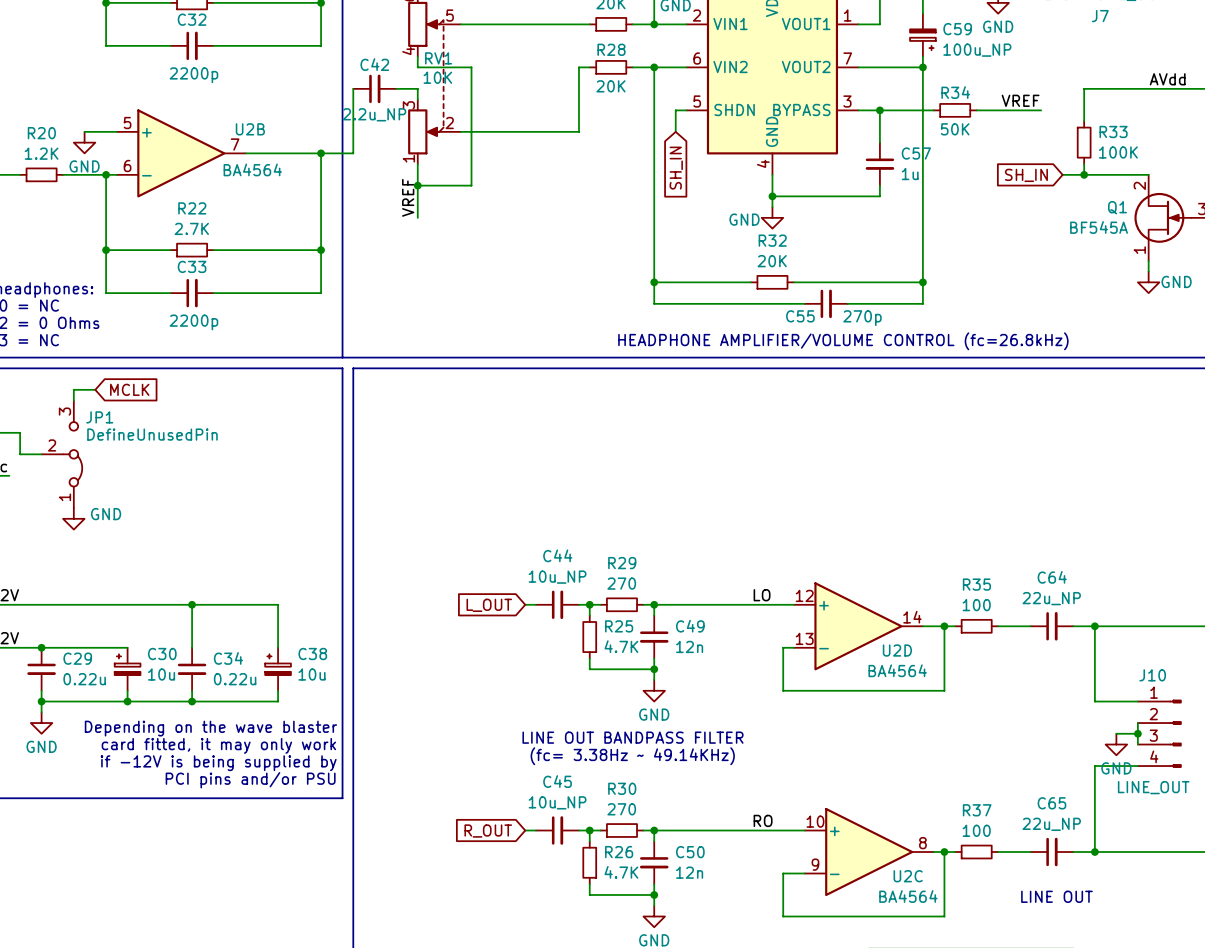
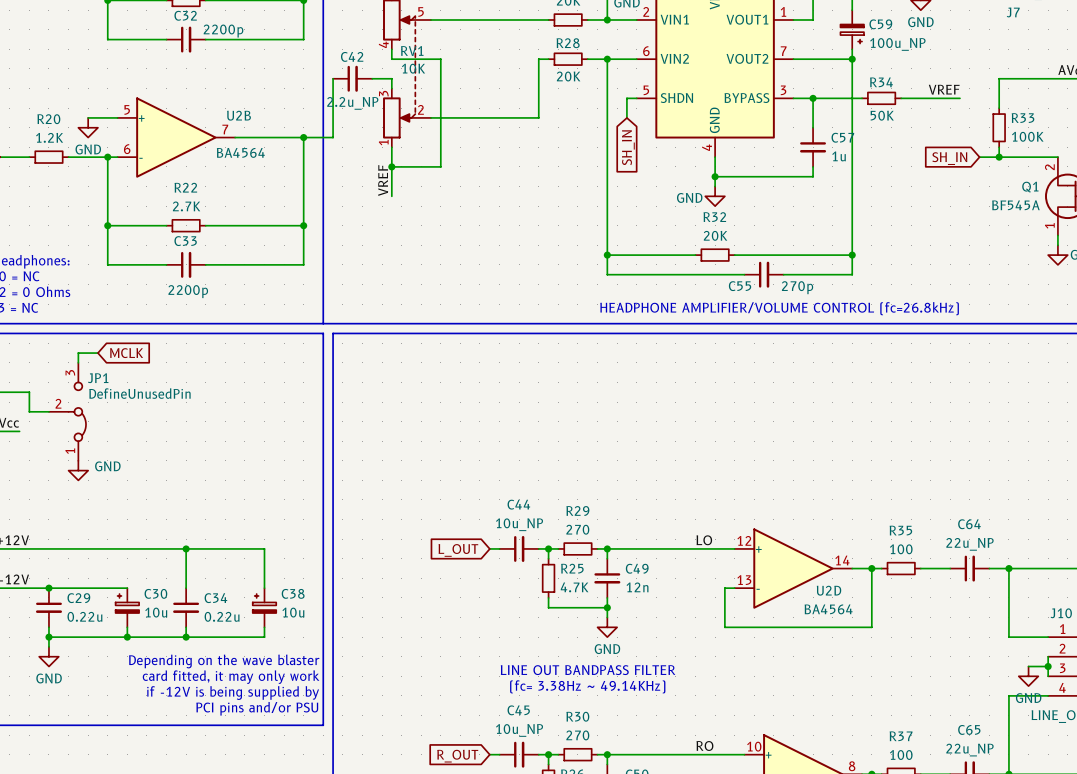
C32 value position: 2200p (193, 75) -> 2200p (223, 31)

